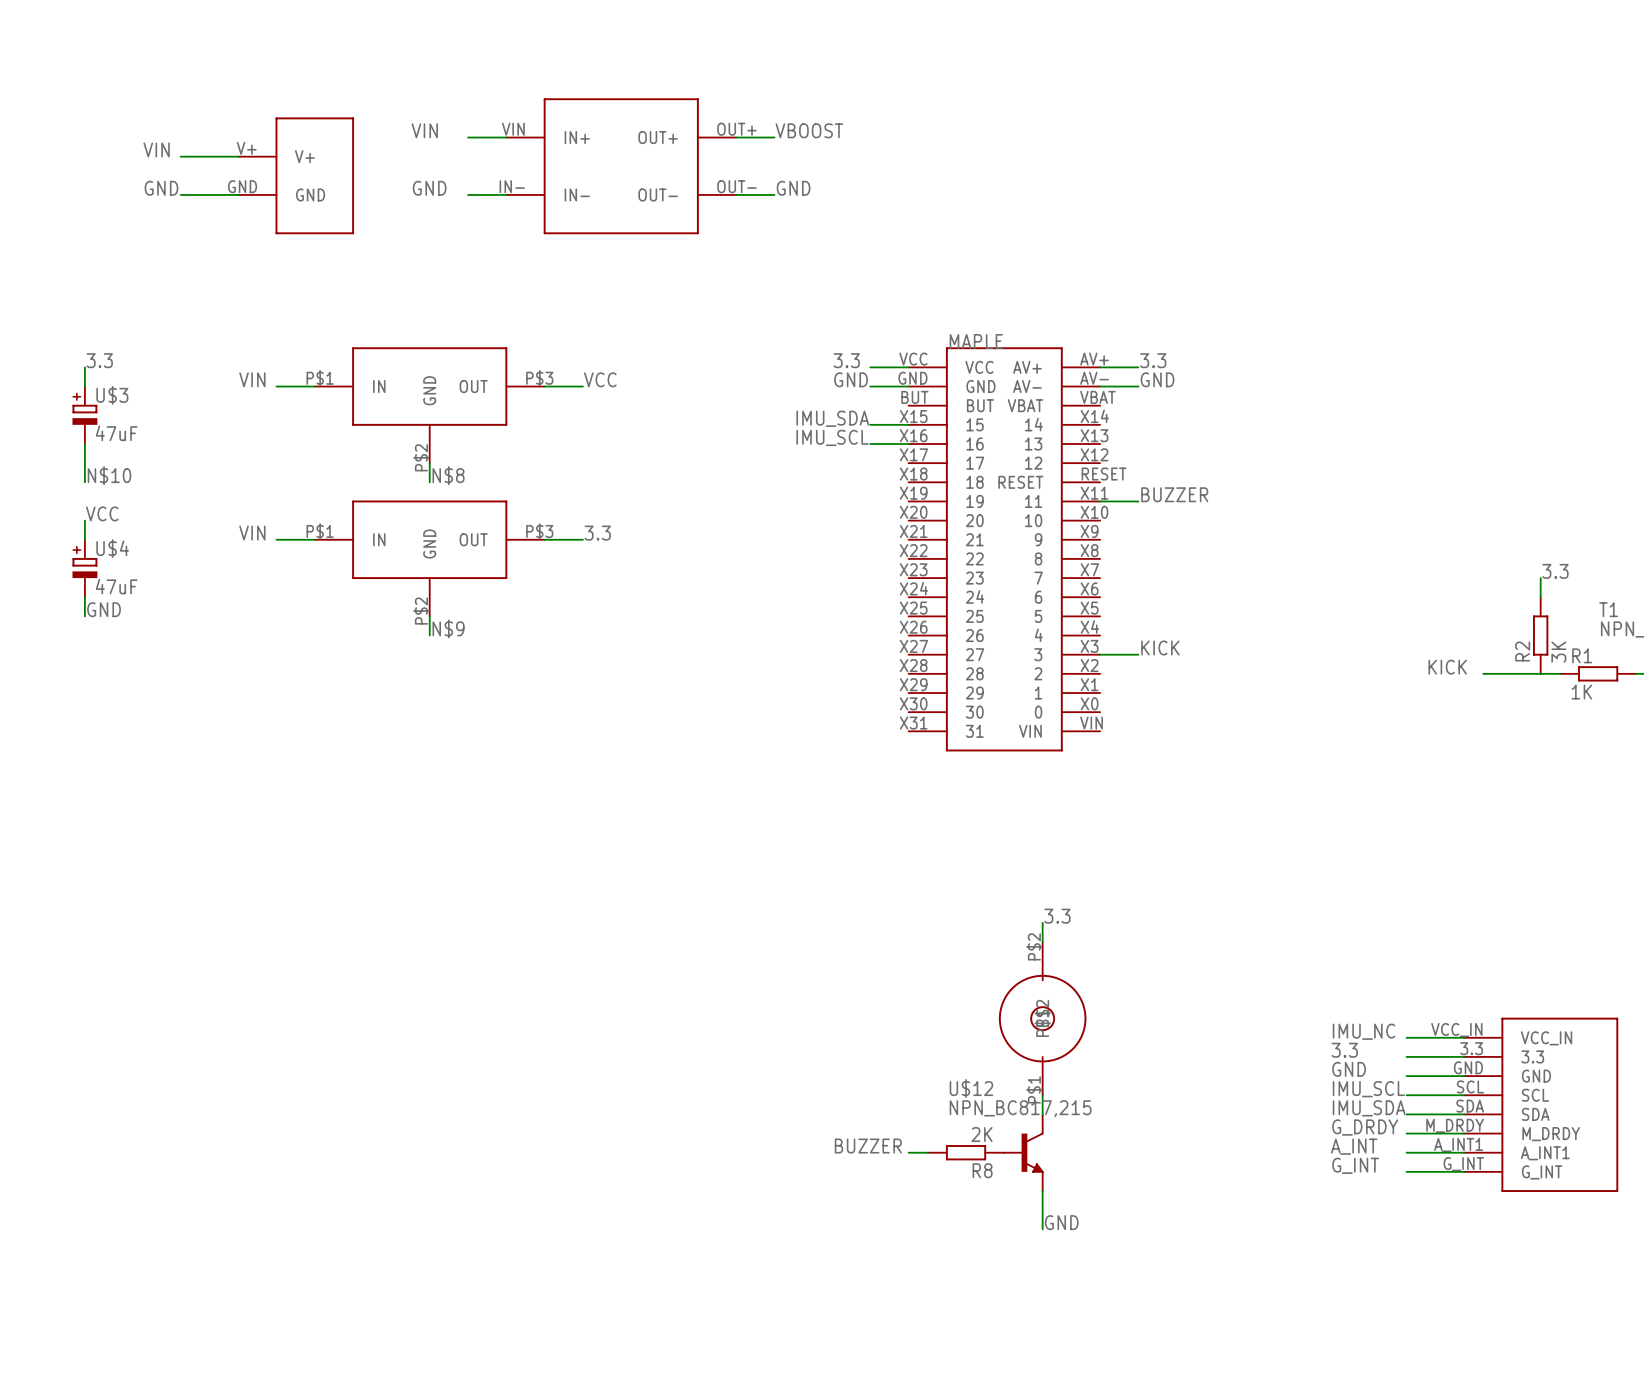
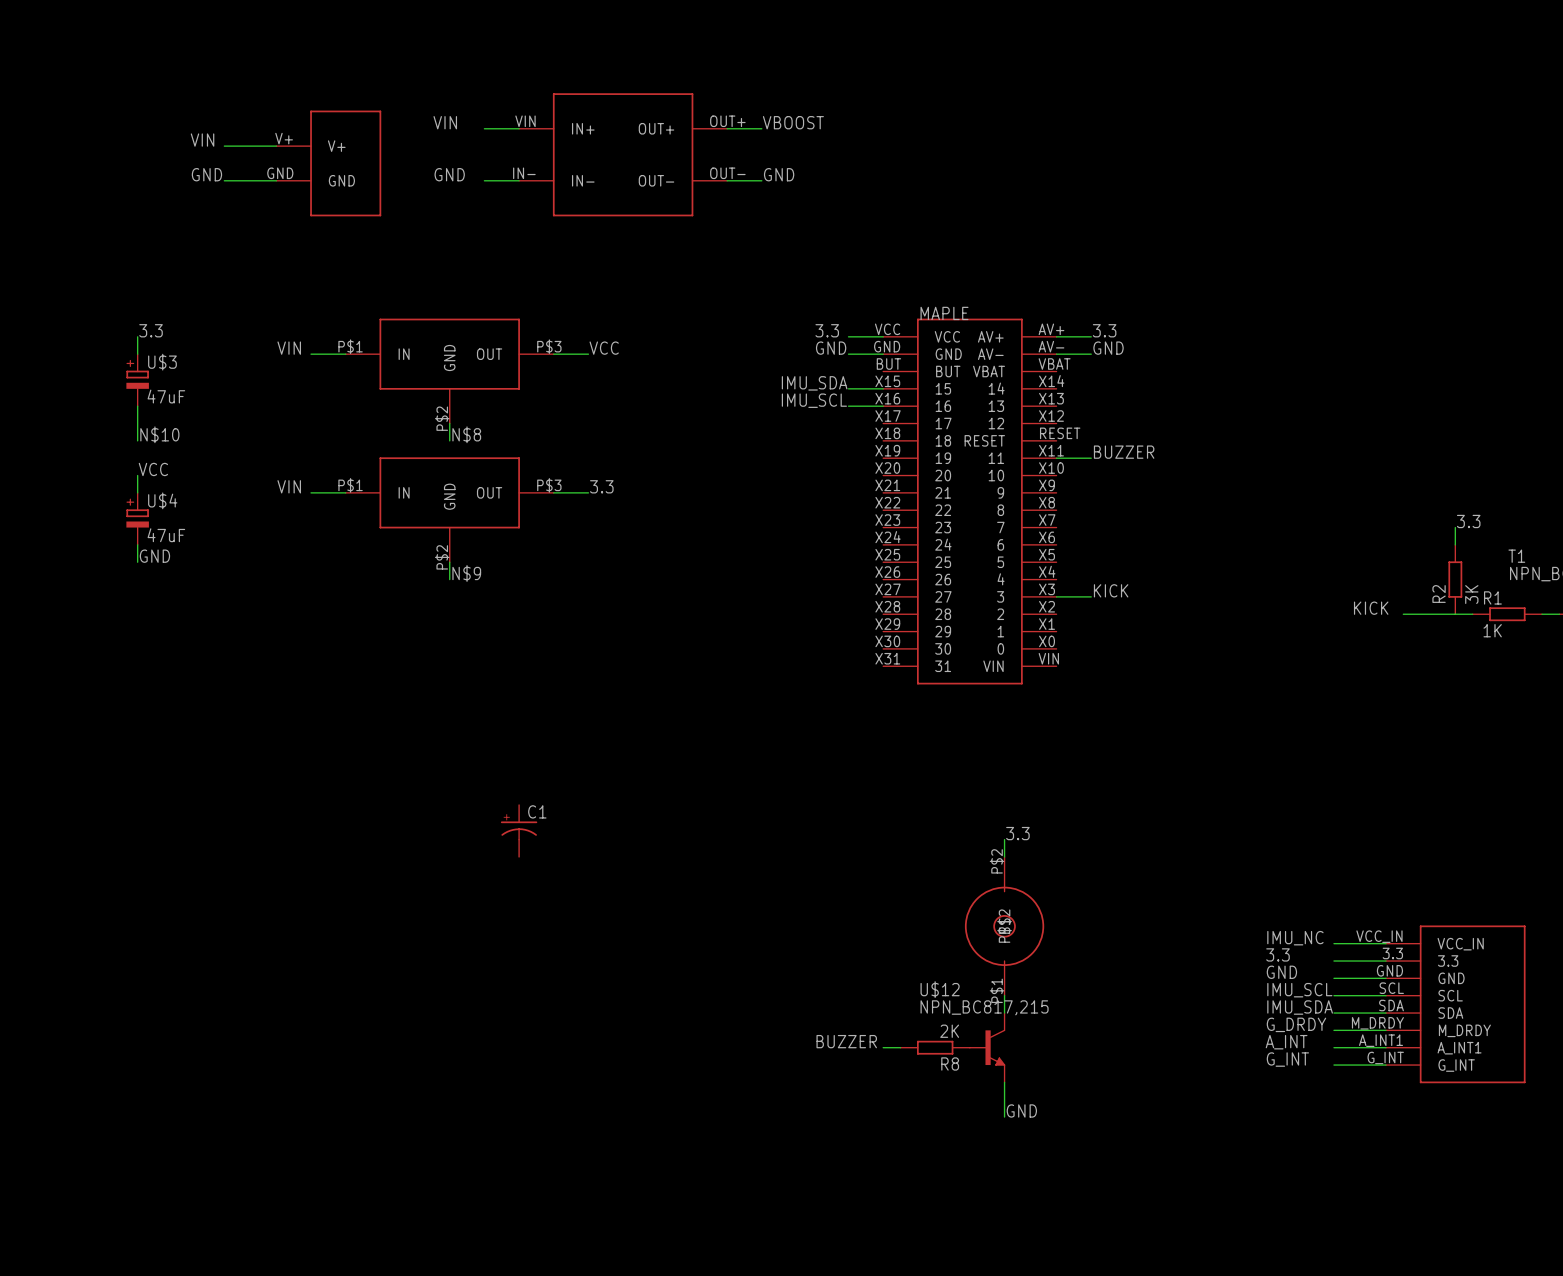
C1: none -> (519, 830)

